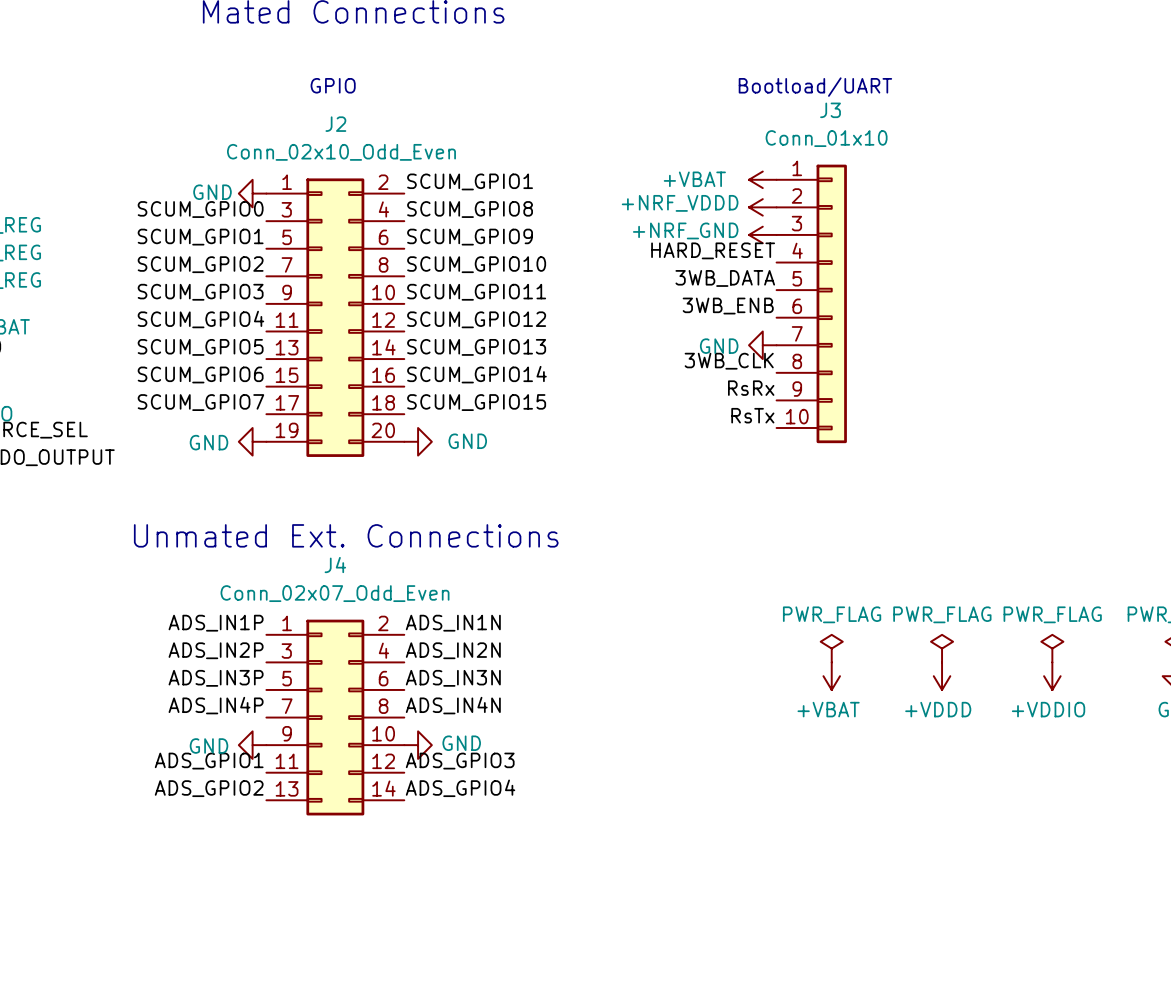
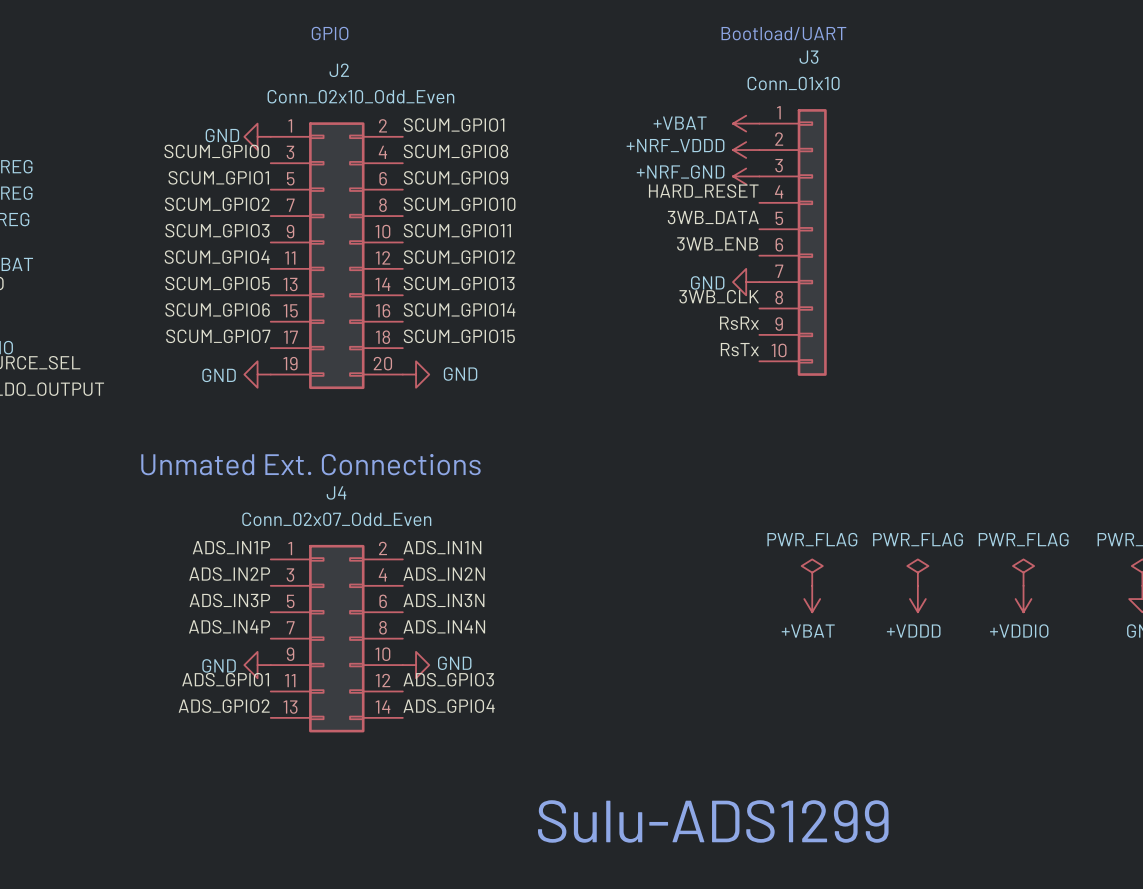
text: none -> Sulu-ADS1299 (713, 821)

